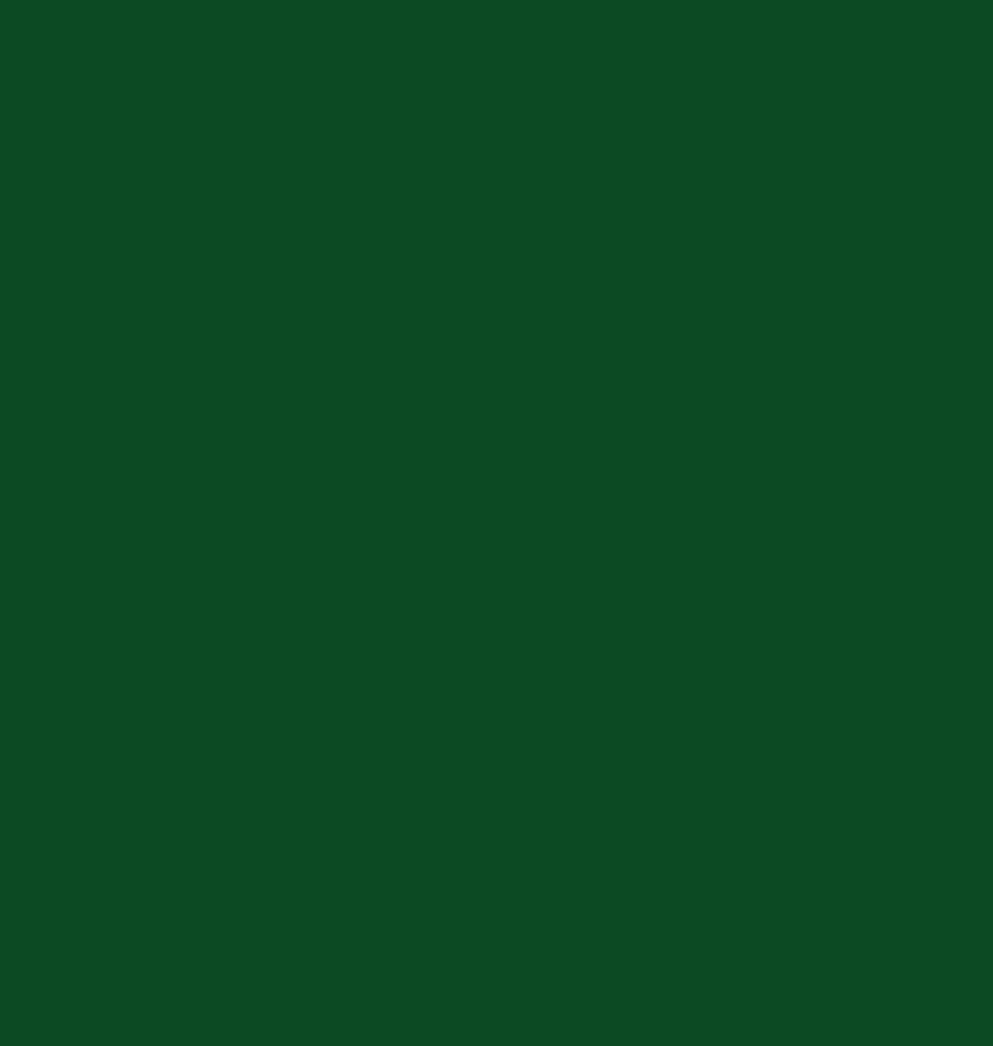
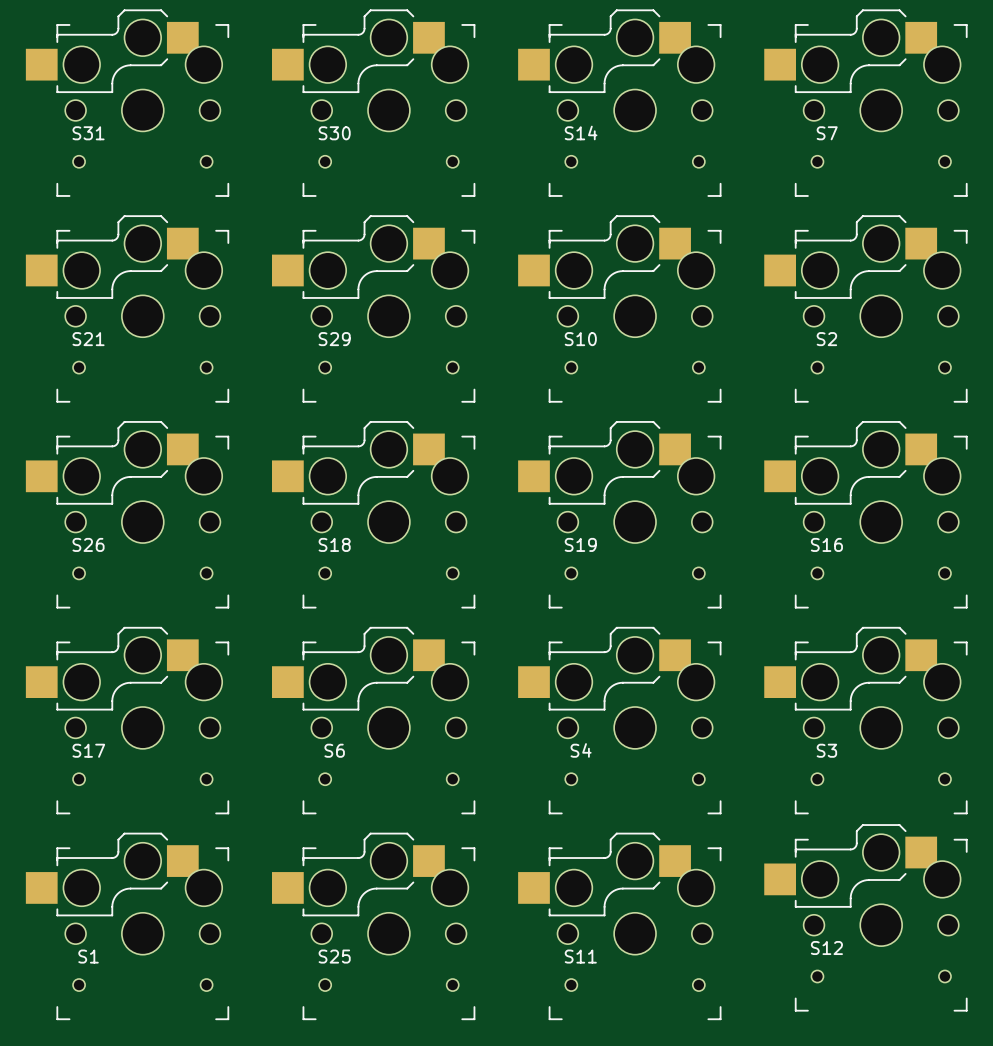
S31: none -> (127, 103)
S30: none -> (373, 103)
S14: none -> (619, 103)
S7: none -> (865, 103)
S21: none -> (127, 308)
S29: none -> (373, 308)
S10: none -> (619, 308)
S2: none -> (865, 308)
S26: none -> (127, 514)
S18: none -> (373, 514)
S19: none -> (619, 514)
S16: none -> (865, 514)
S17: none -> (127, 720)
S6: none -> (373, 720)
S4: none -> (619, 720)
S3: none -> (865, 720)
S12: none -> (865, 917)
S1: none -> (127, 926)
S25: none -> (373, 926)
S11: none -> (619, 926)

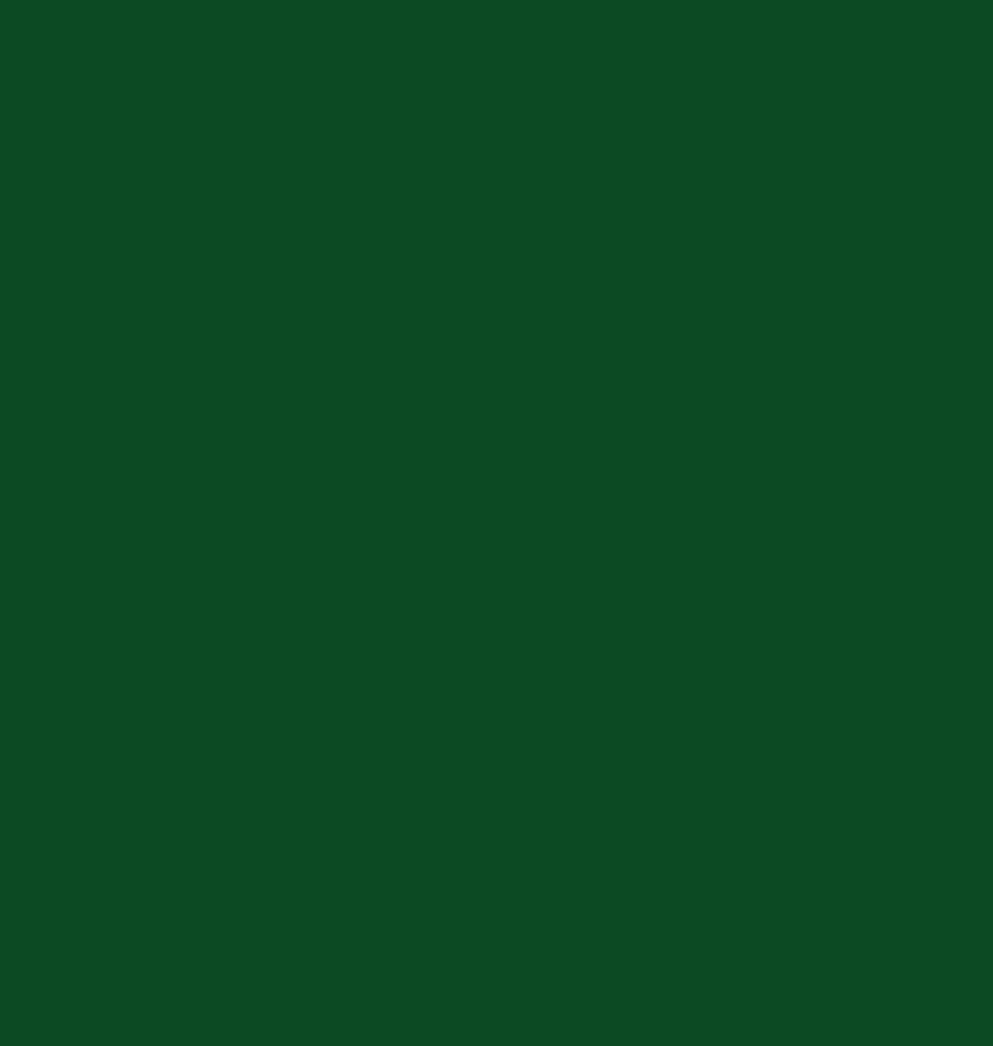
S31: (127, 103) -> none
S30: (373, 103) -> none
S14: (619, 103) -> none
S7: (865, 103) -> none
S21: (127, 308) -> none
S29: (373, 308) -> none
S10: (619, 308) -> none
S2: (865, 308) -> none
S26: (127, 514) -> none
S18: (373, 514) -> none
S19: (619, 514) -> none
S16: (865, 514) -> none
S17: (127, 720) -> none
S6: (373, 720) -> none
S4: (619, 720) -> none
S3: (865, 720) -> none
S12: (865, 917) -> none
S1: (127, 926) -> none
S25: (373, 926) -> none
S11: (619, 926) -> none

